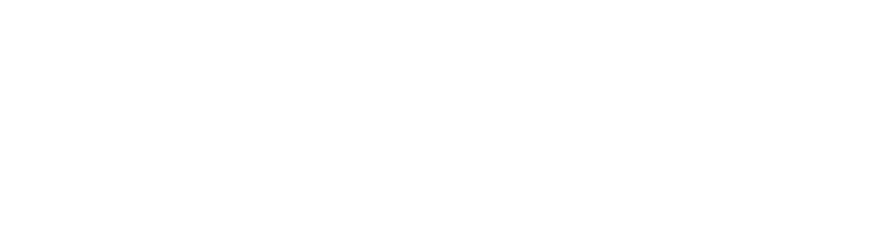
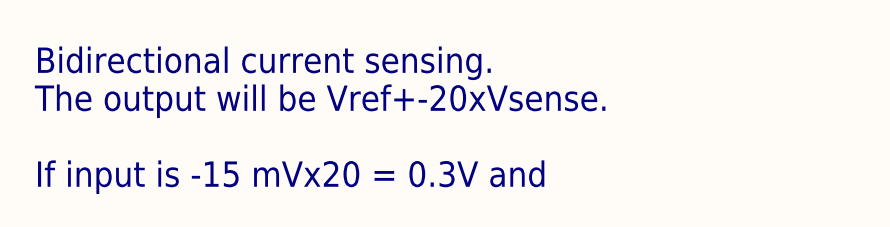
text: none -> Bidirectional current sensing. (264, 63)
text: none -> The output will be Vref+-20xVsense. (320, 101)
text: none -> If input is -15 mVx20 = 0.3V and (291, 177)

